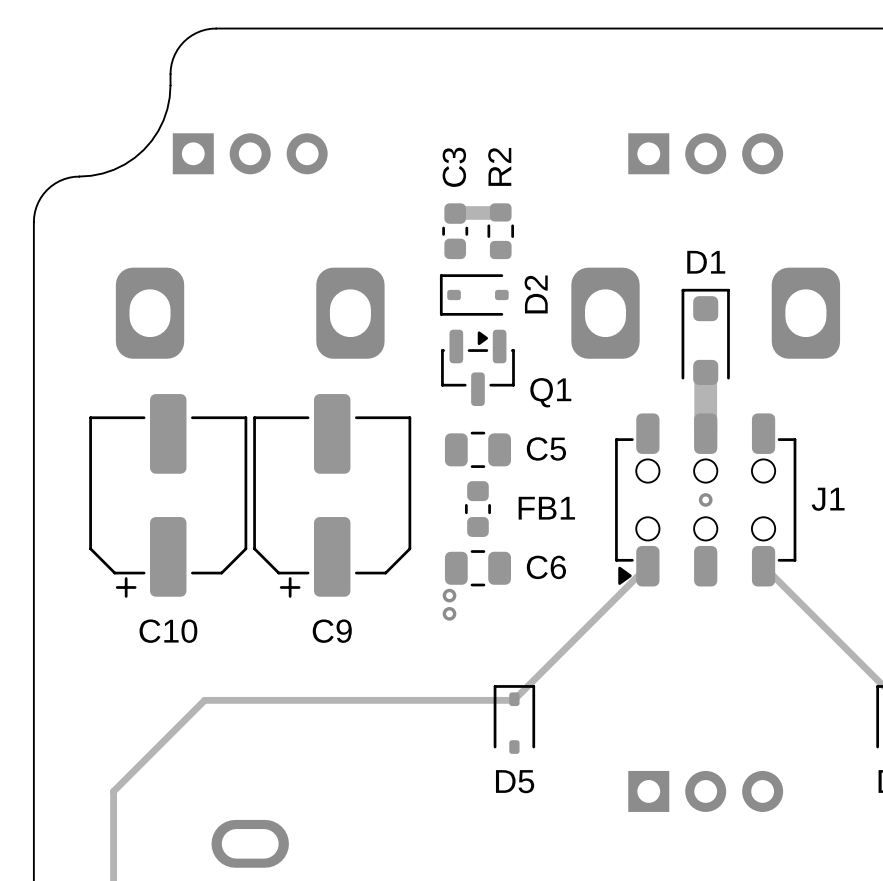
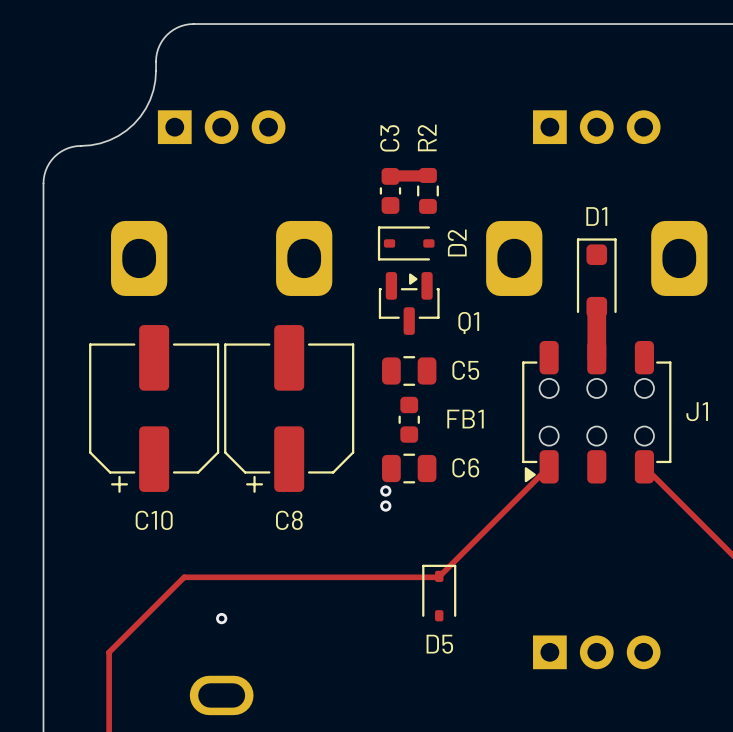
via: (705, 499) -> none
C9 name: C9 (332, 631) -> C8 (289, 520)
via: none -> (221, 618)

